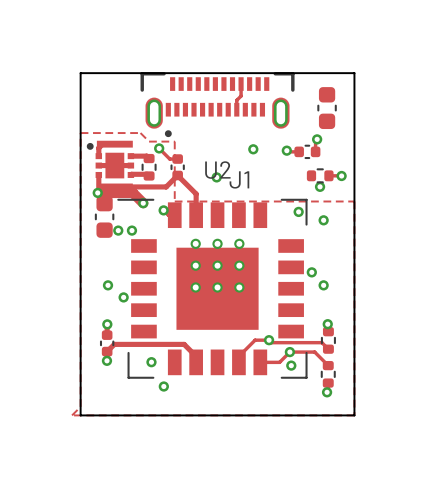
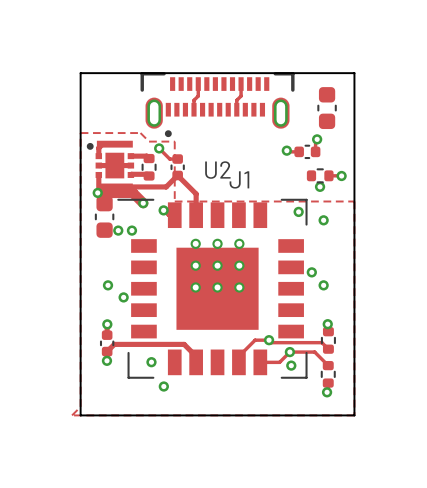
track: none -> (198, 84) (198, 96) (194, 100) (194, 109)
via: (253, 149) -> none
via: (216, 177) -> none

